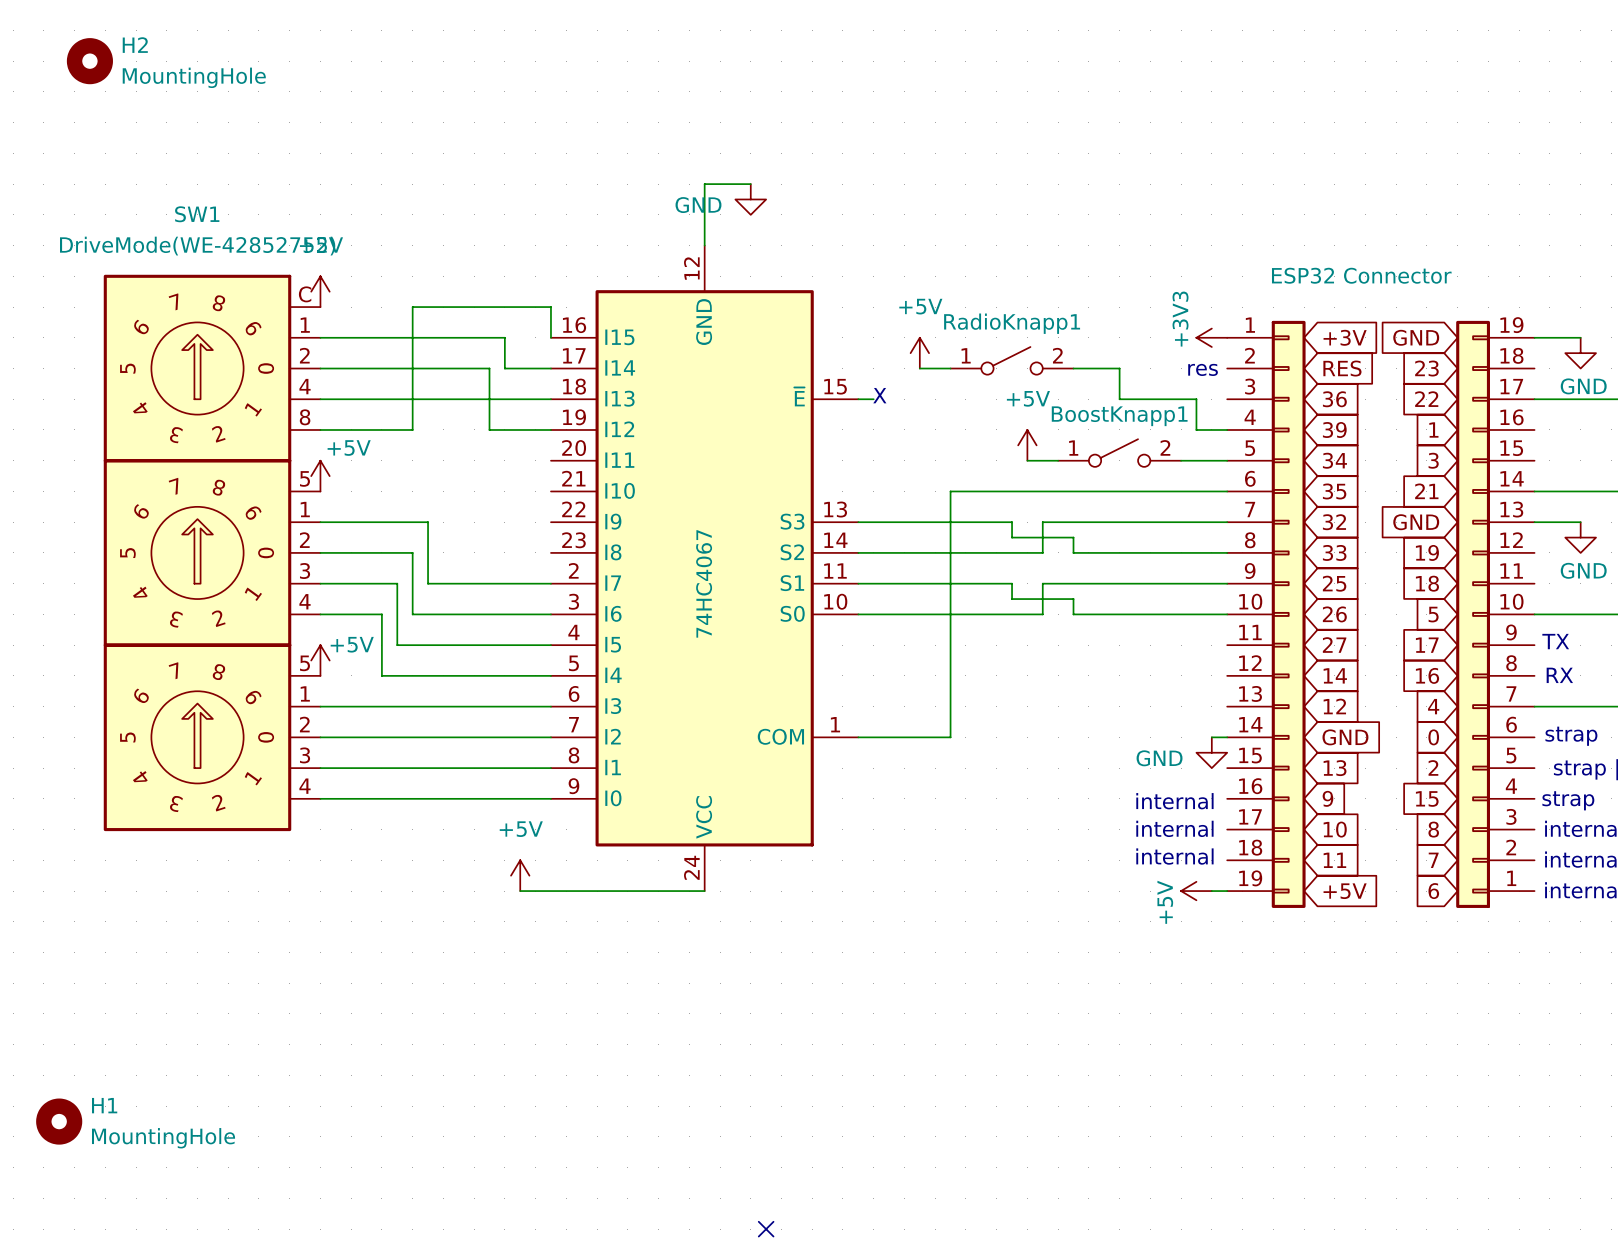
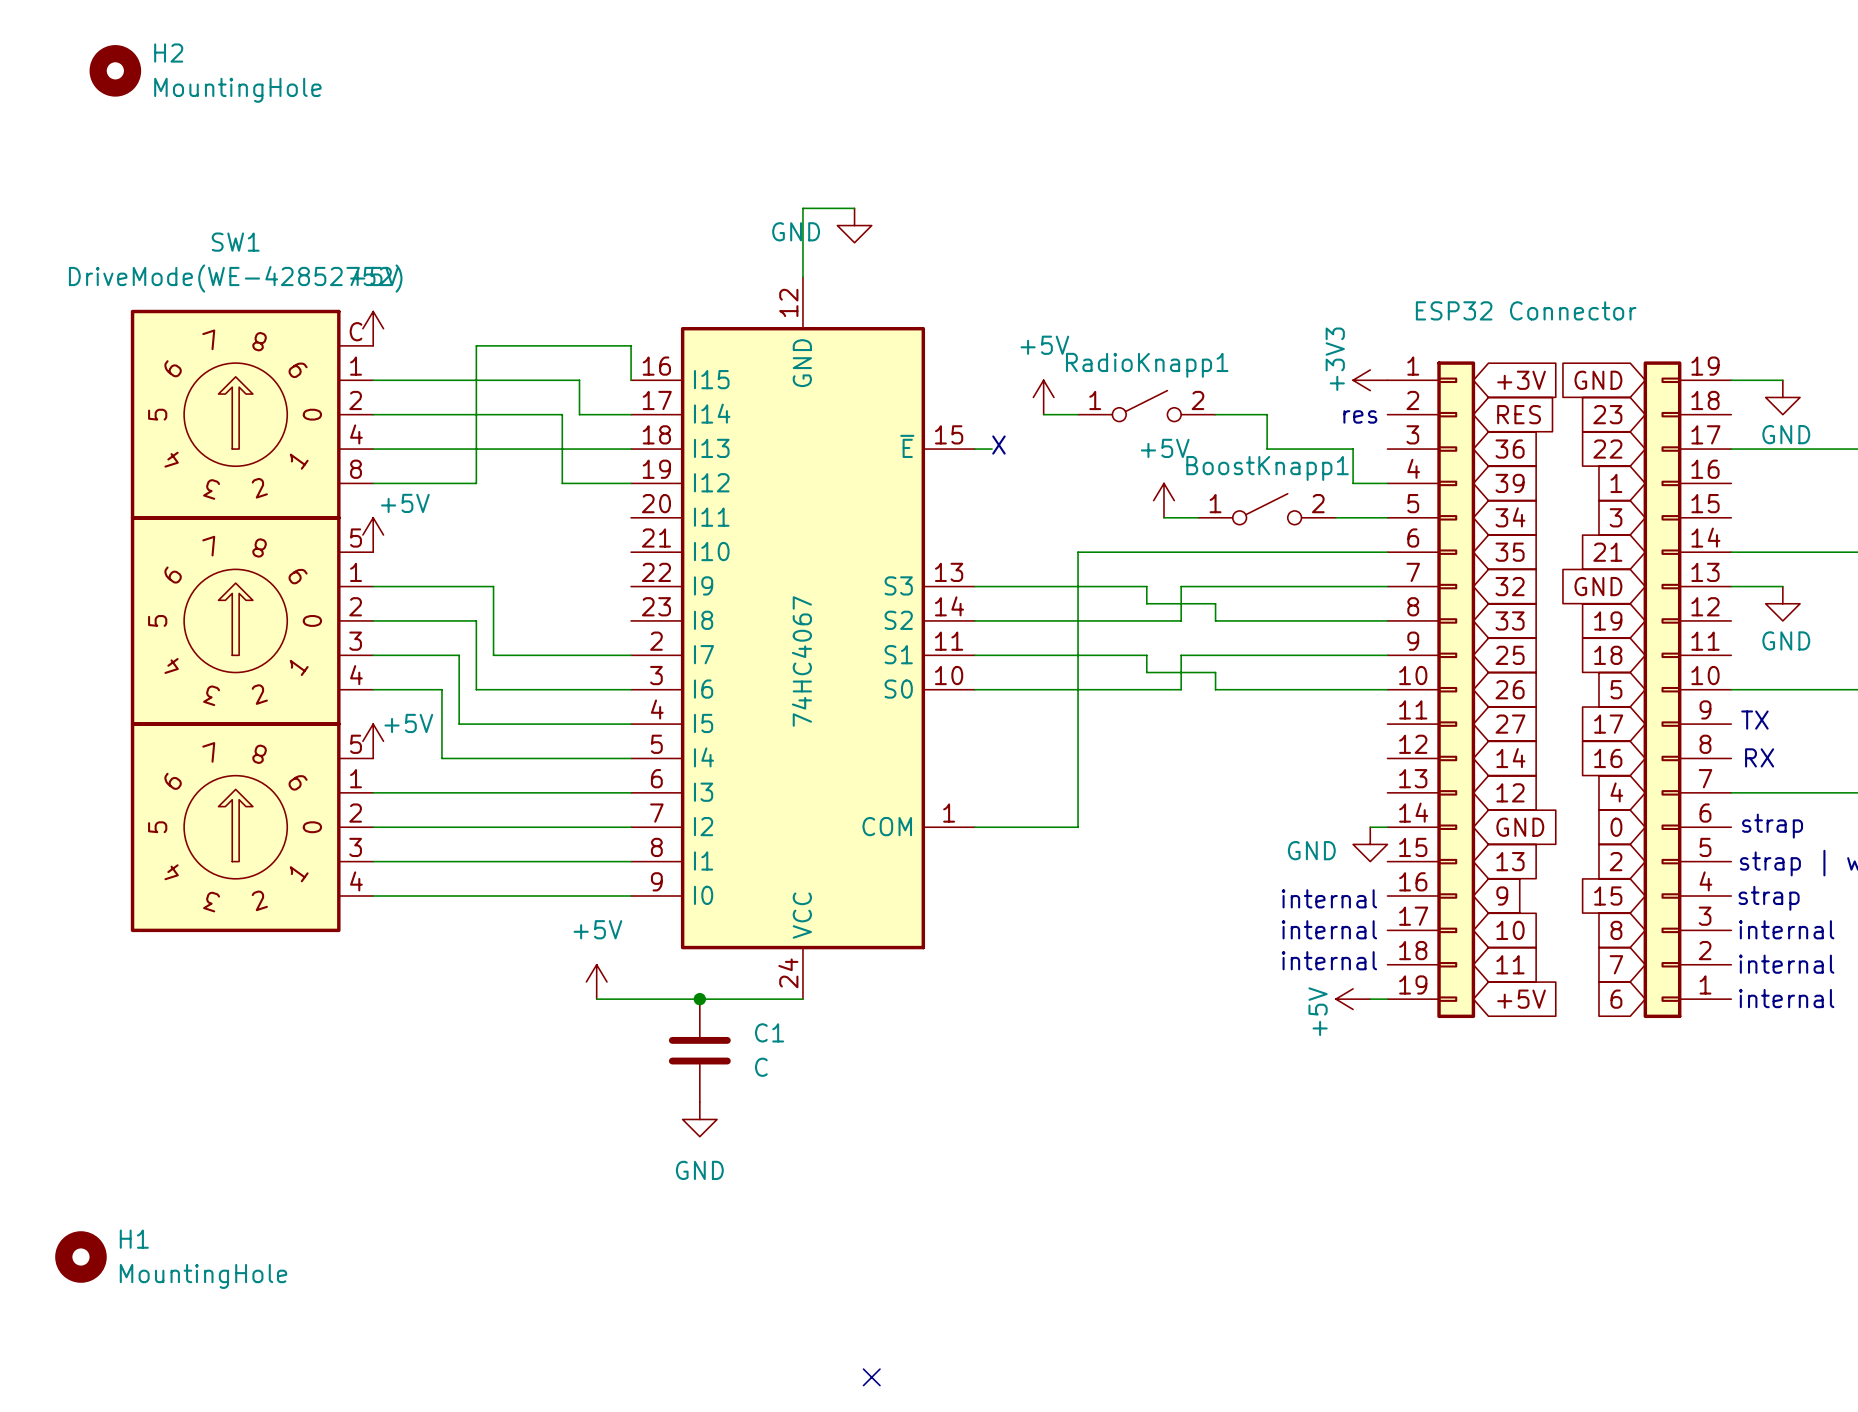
junction: none -> (699, 999)
C1: none -> C (699, 1050)
power symbol: none -> GND (699, 1119)

